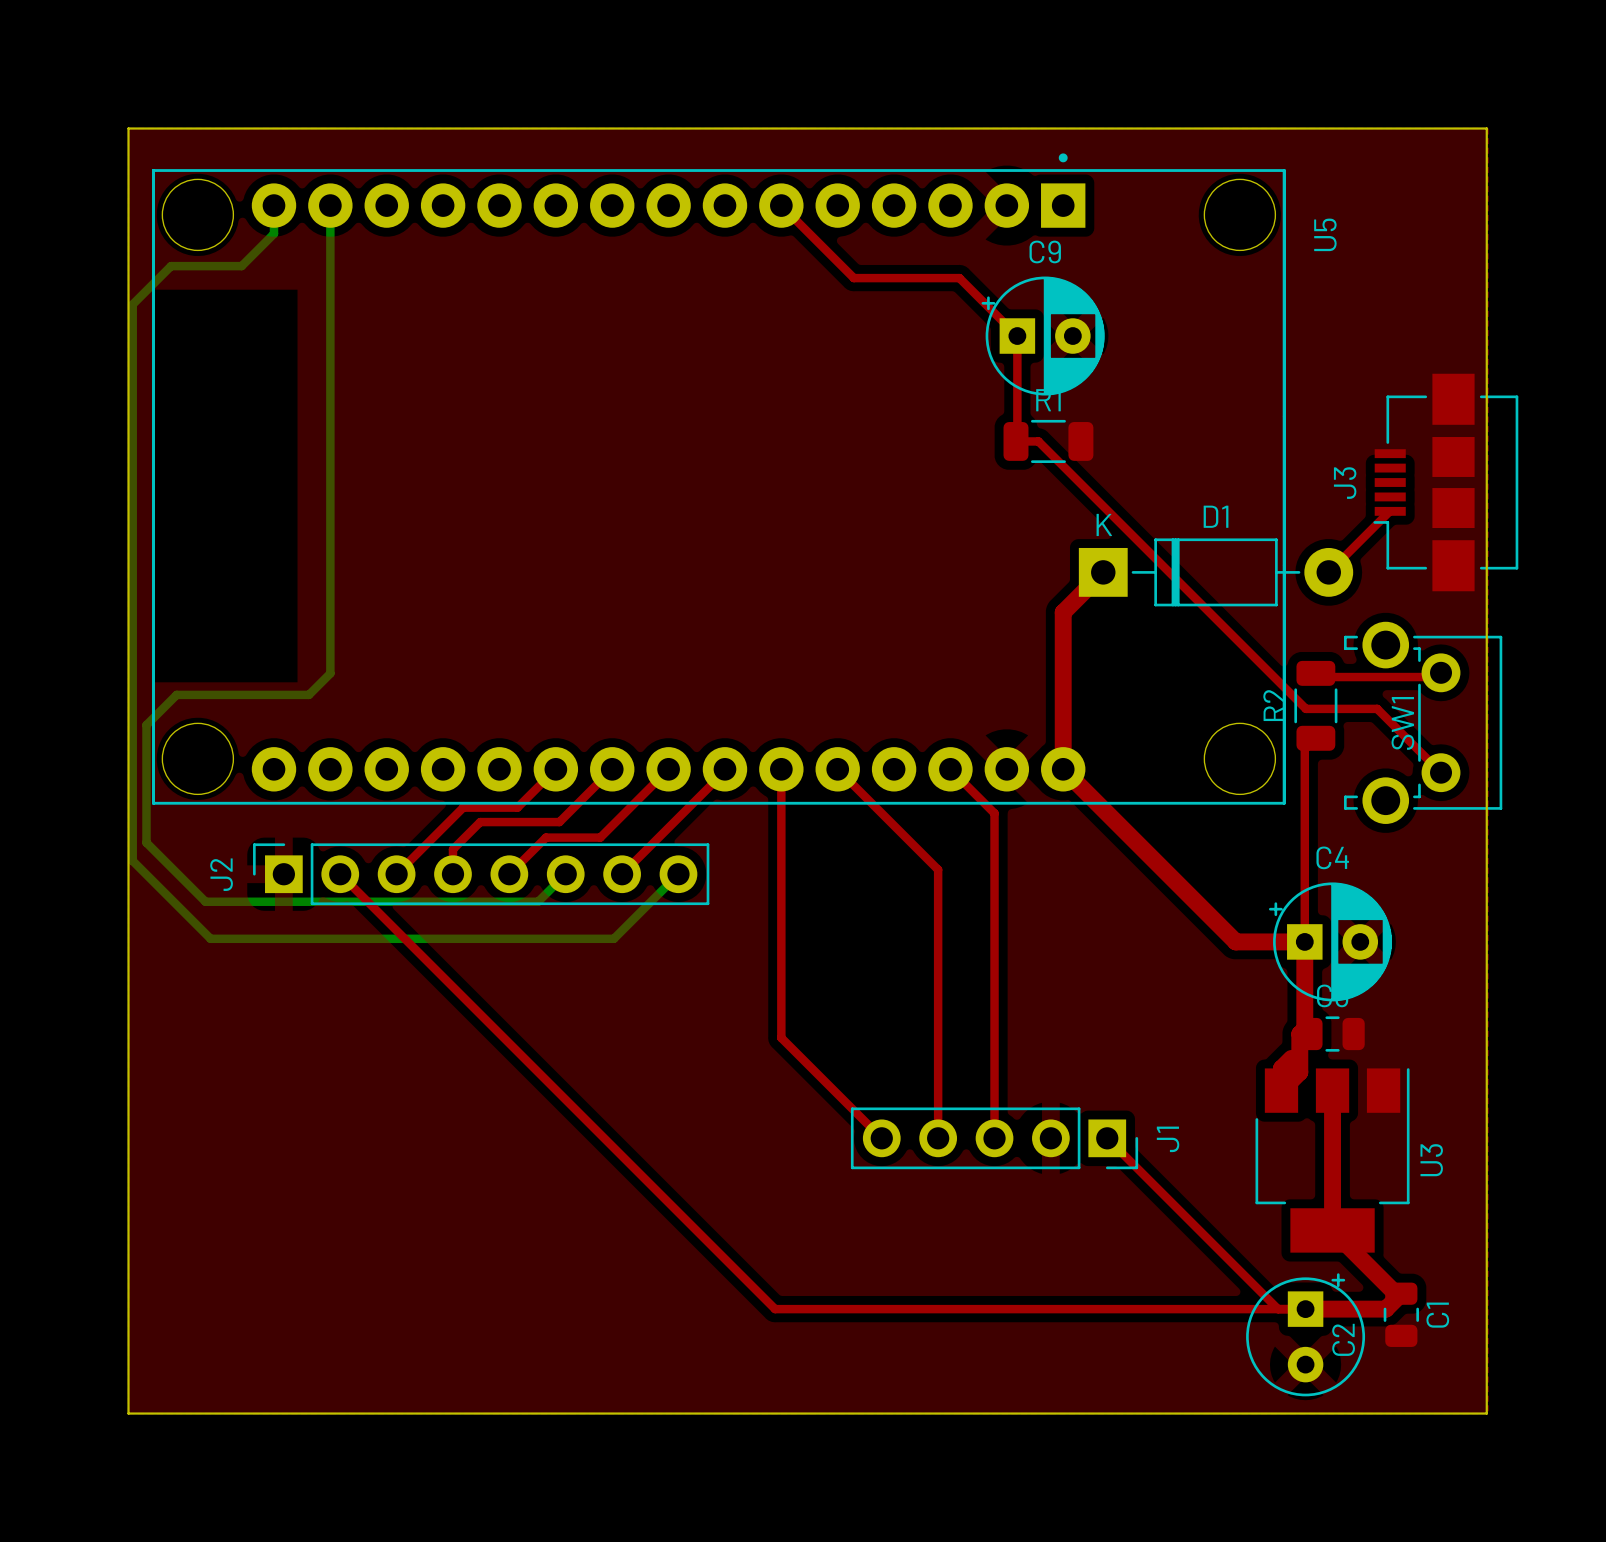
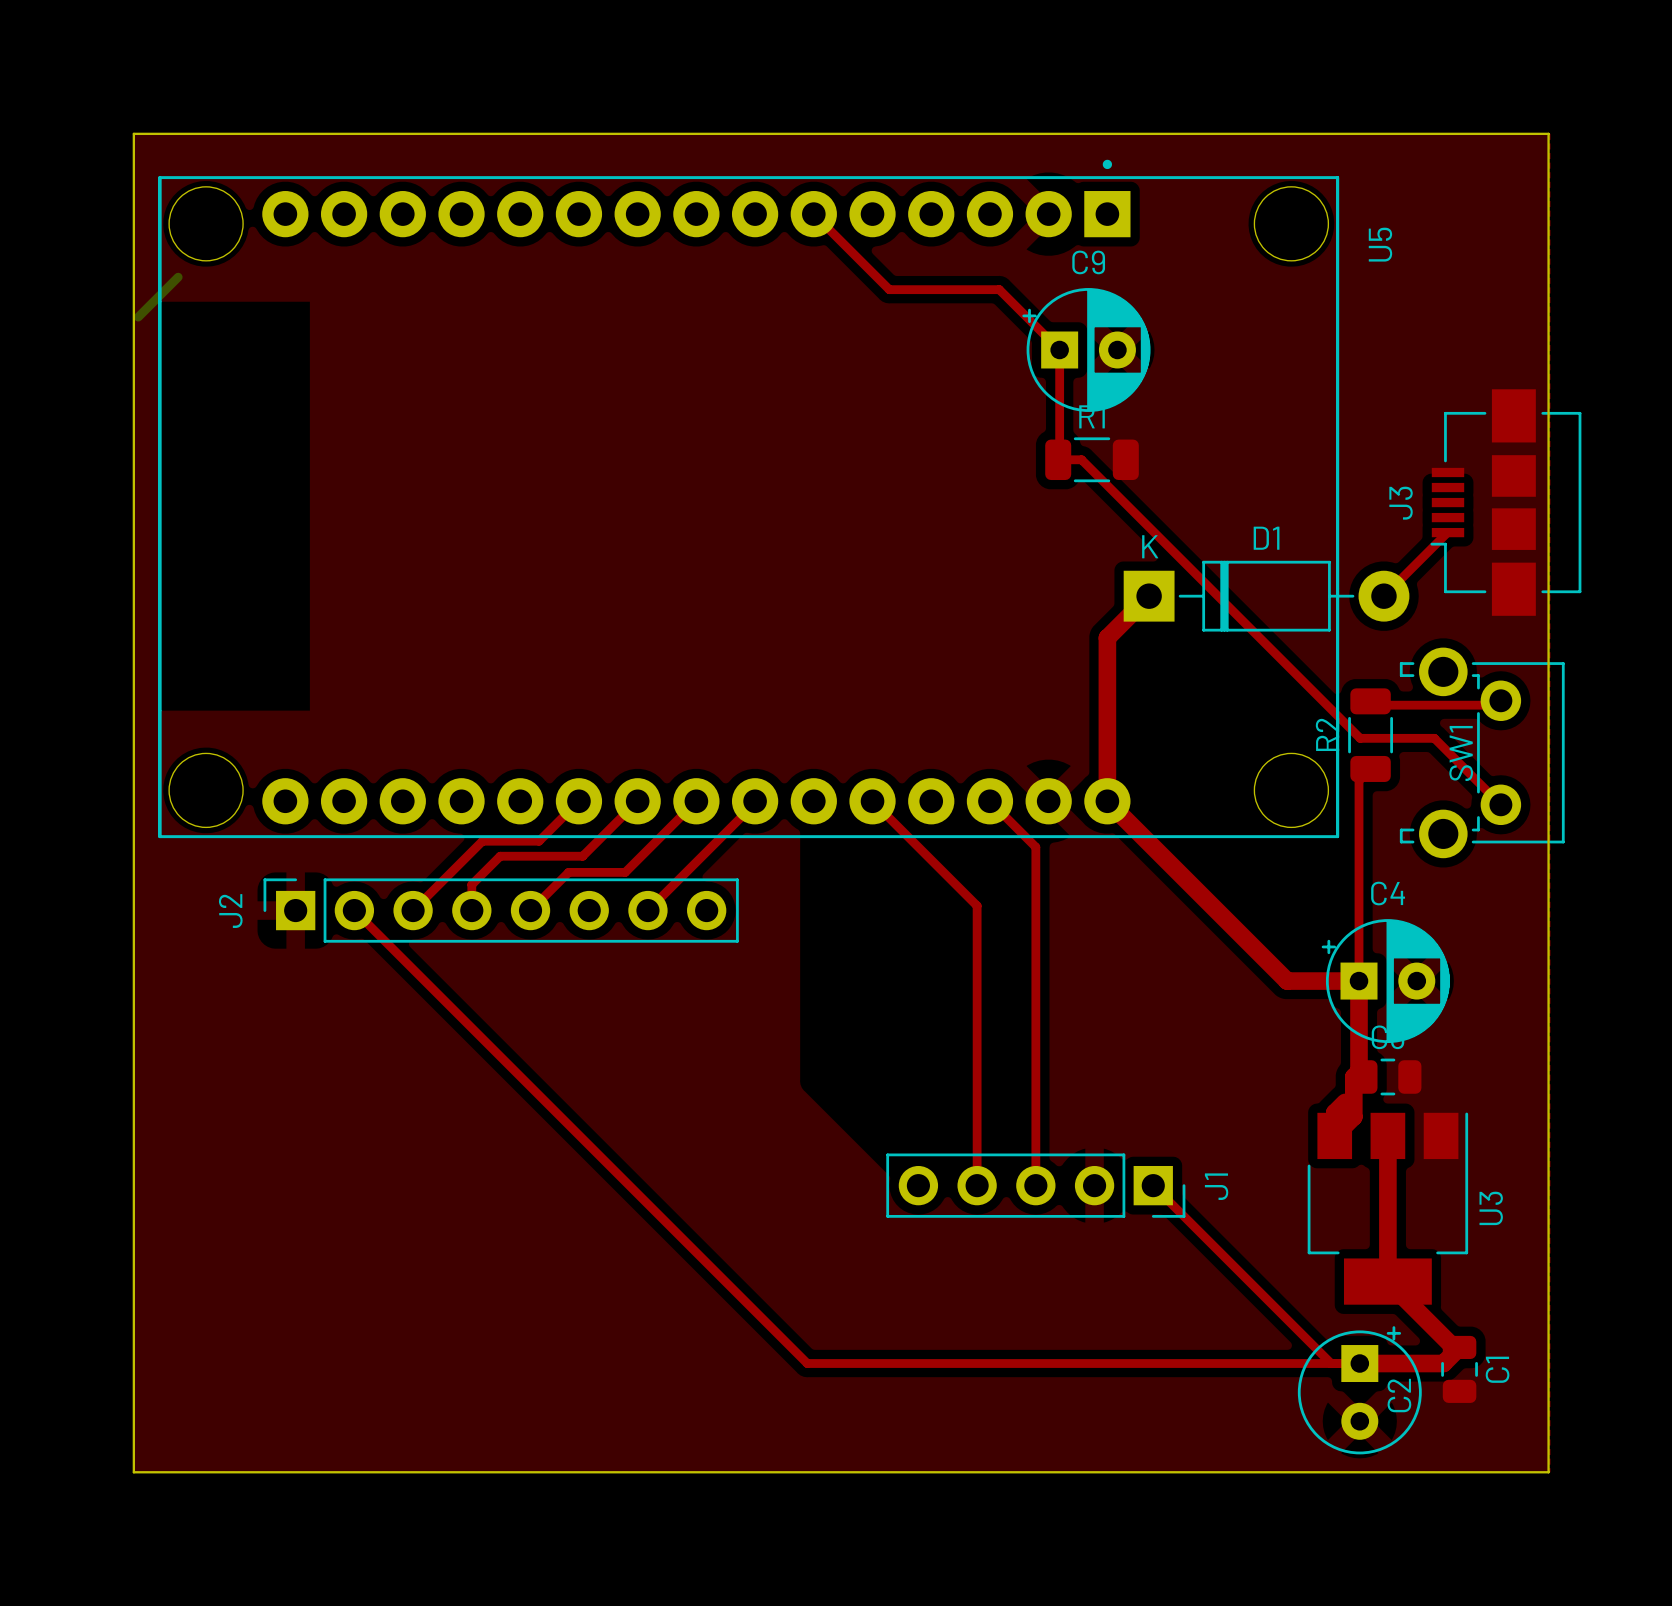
bottom track: (273, 205) (273, 233) (241, 266) (171, 266) -> none
bottom track: (330, 205) (330, 673) (308, 694) (176, 694) (146, 725) (146, 842) (205, 901) (538, 901) (565, 874) -> none
bottom track: (132, 304) (132, 860) (210, 938) (613, 938) (678, 874) -> none
top track: (781, 769) (781, 1037) (881, 1138) -> none

